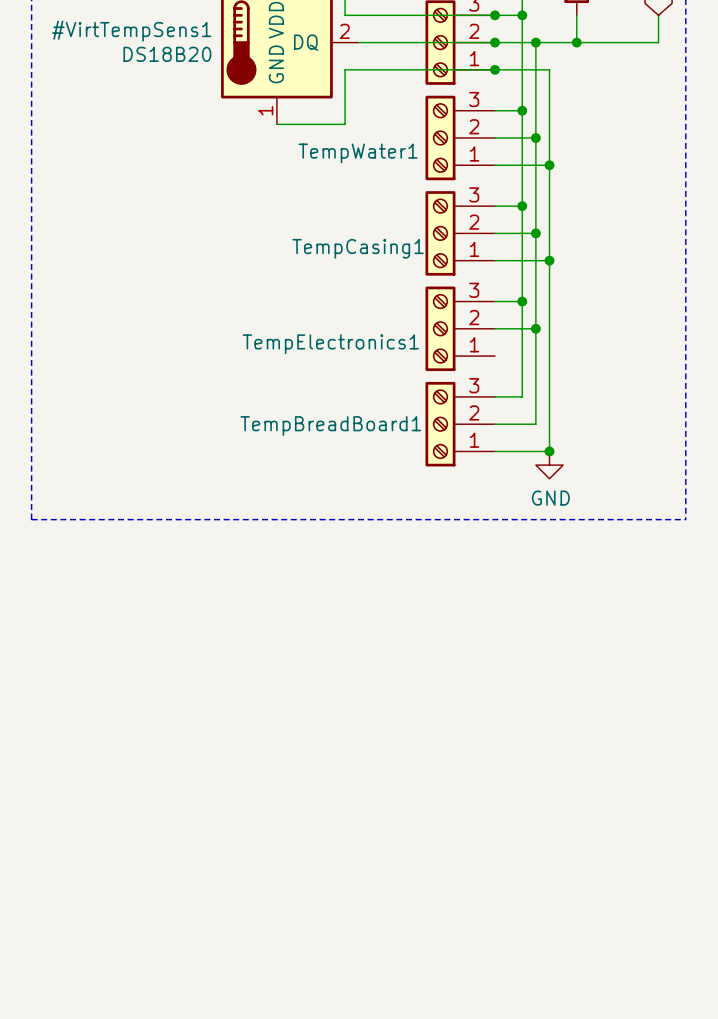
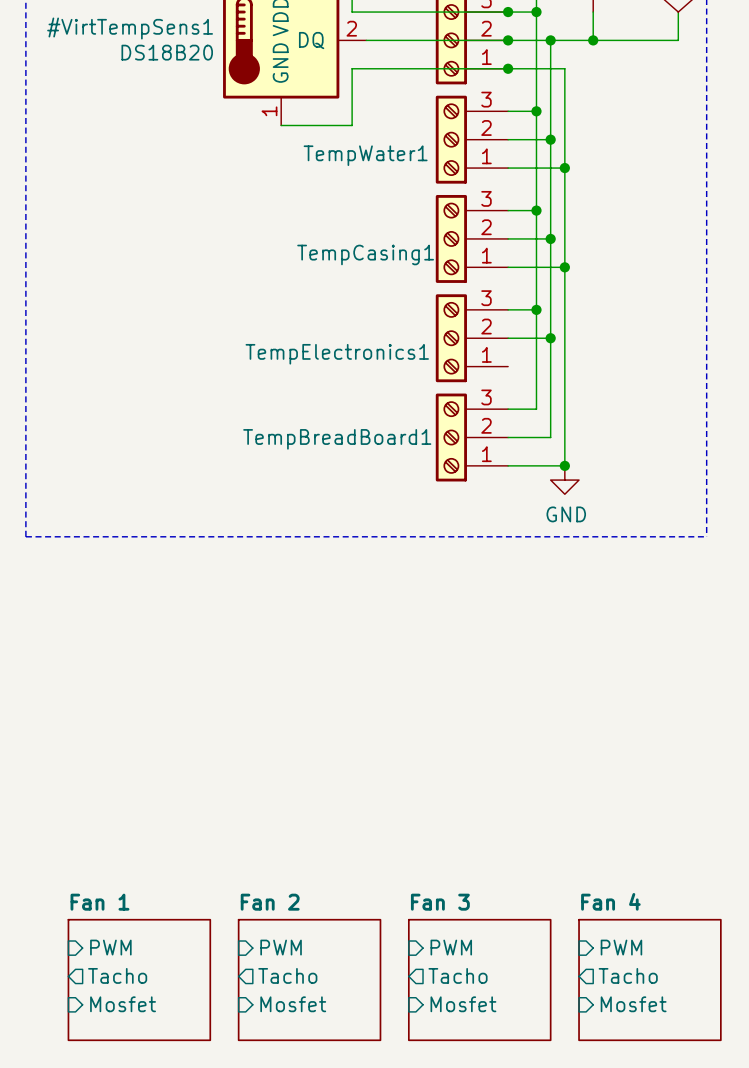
sheet pin: none -> PWM (110, 947)
sheet pin: none -> PWM (281, 947)
sheet pin: none -> PWM (451, 947)
sheet pin: none -> PWM (621, 947)
sheet pin: none -> Tacho (117, 975)
sheet pin: none -> Tacho (287, 975)
sheet pin: none -> Tacho (458, 975)
sheet pin: none -> Tacho (628, 975)
sheet Fan 1: none -> (139, 980)
sheet Fan 2: none -> (309, 980)
sheet Fan 3: none -> (479, 980)
sheet Fan 4: none -> (649, 980)
sheet pin: none -> Mosfet (123, 1004)
sheet pin: none -> Mosfet (293, 1004)
sheet pin: none -> Mosfet (463, 1004)
sheet pin: none -> Mosfet (633, 1004)

